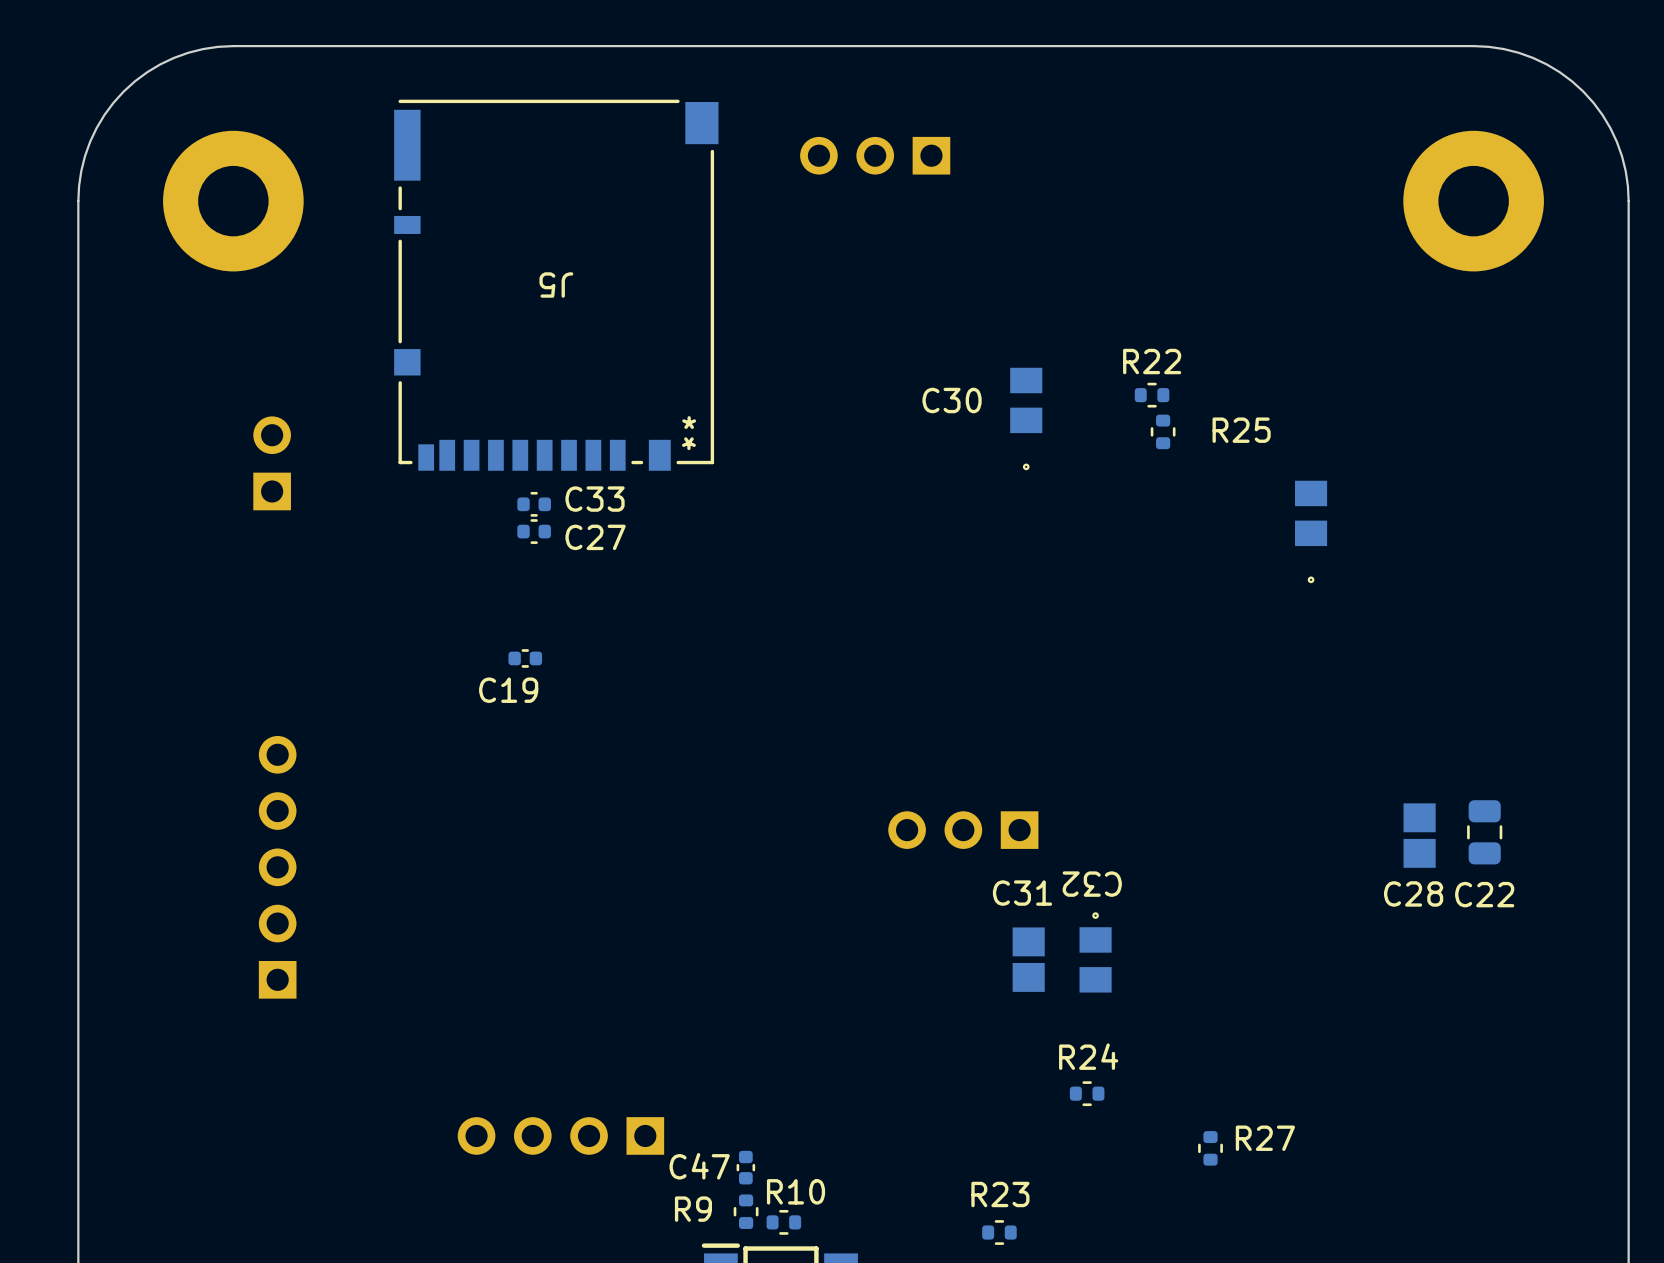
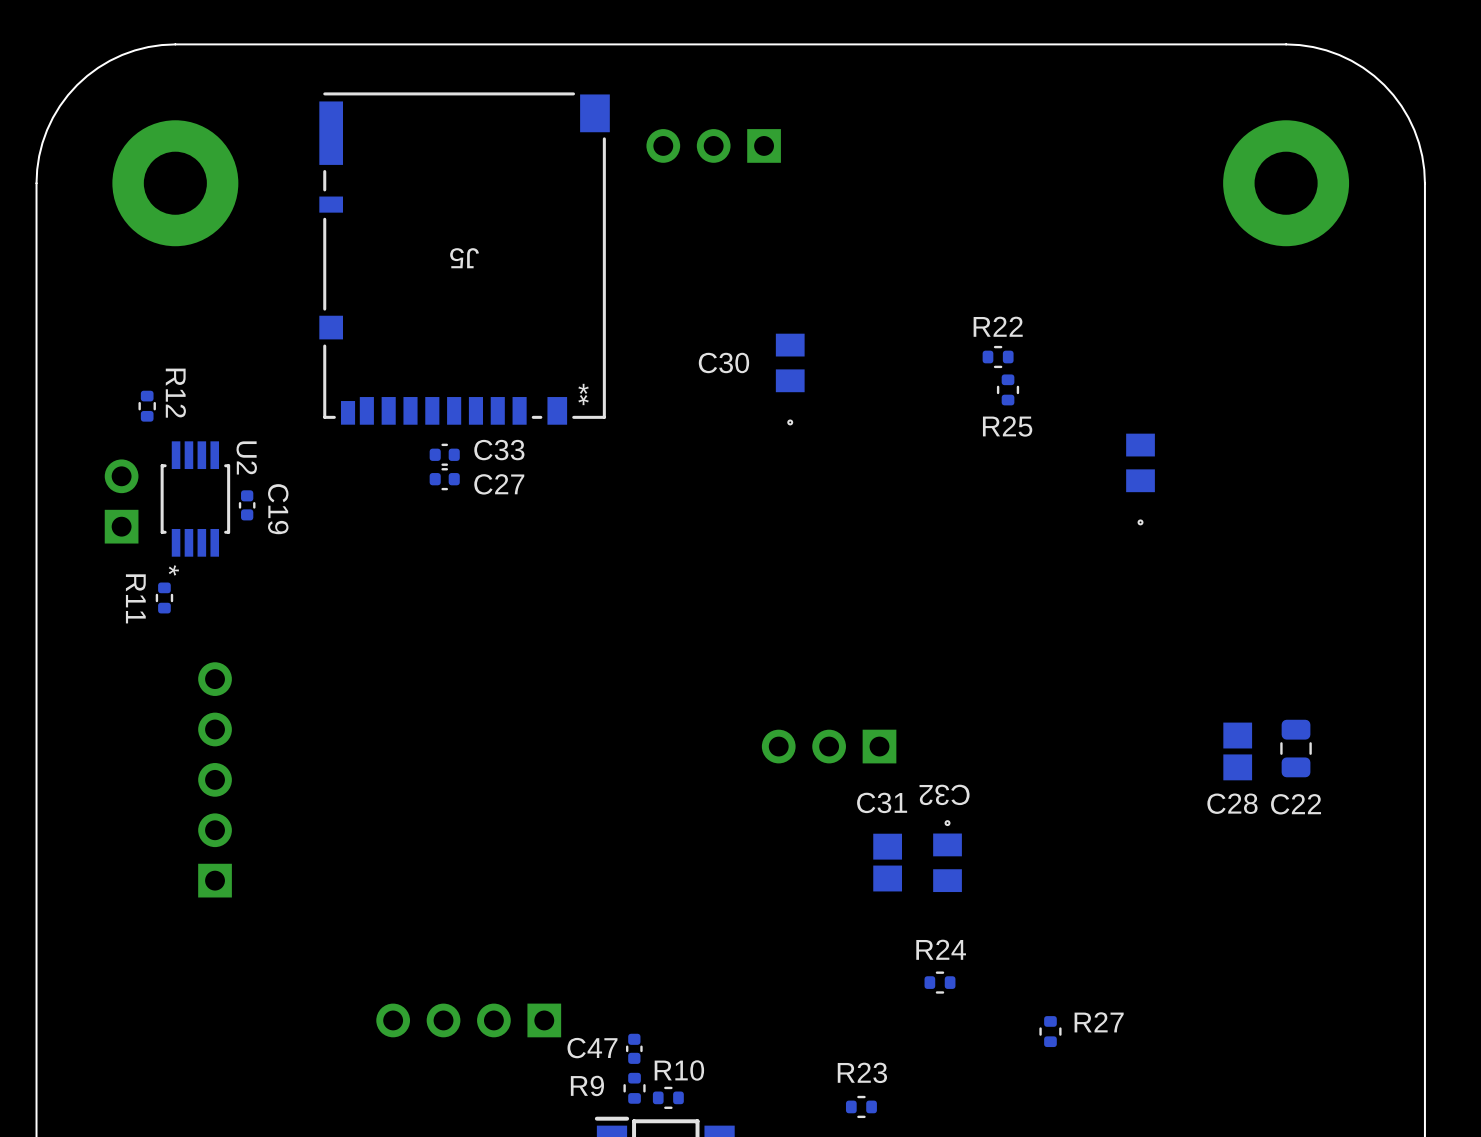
J5 footprint: [394, 99, 719, 471] -> [319, 92, 610, 425]
part position: (875, 155) -> (713, 145)
C30 position: (1026, 419) -> (790, 379)
R25 name position: R25 (1241, 430) -> R25 (1007, 426)
R12: none -> (147, 406)
part position: (272, 463) -> (121, 501)
U2: none -> (195, 499)
C19 rotation: 0° (525, 658) -> 90° clockwise (247, 505)
C19 position: (525, 658) -> (247, 505)
R11: none -> (164, 597)
C19 name position: C19 (508, 690) -> C19 (278, 509)

